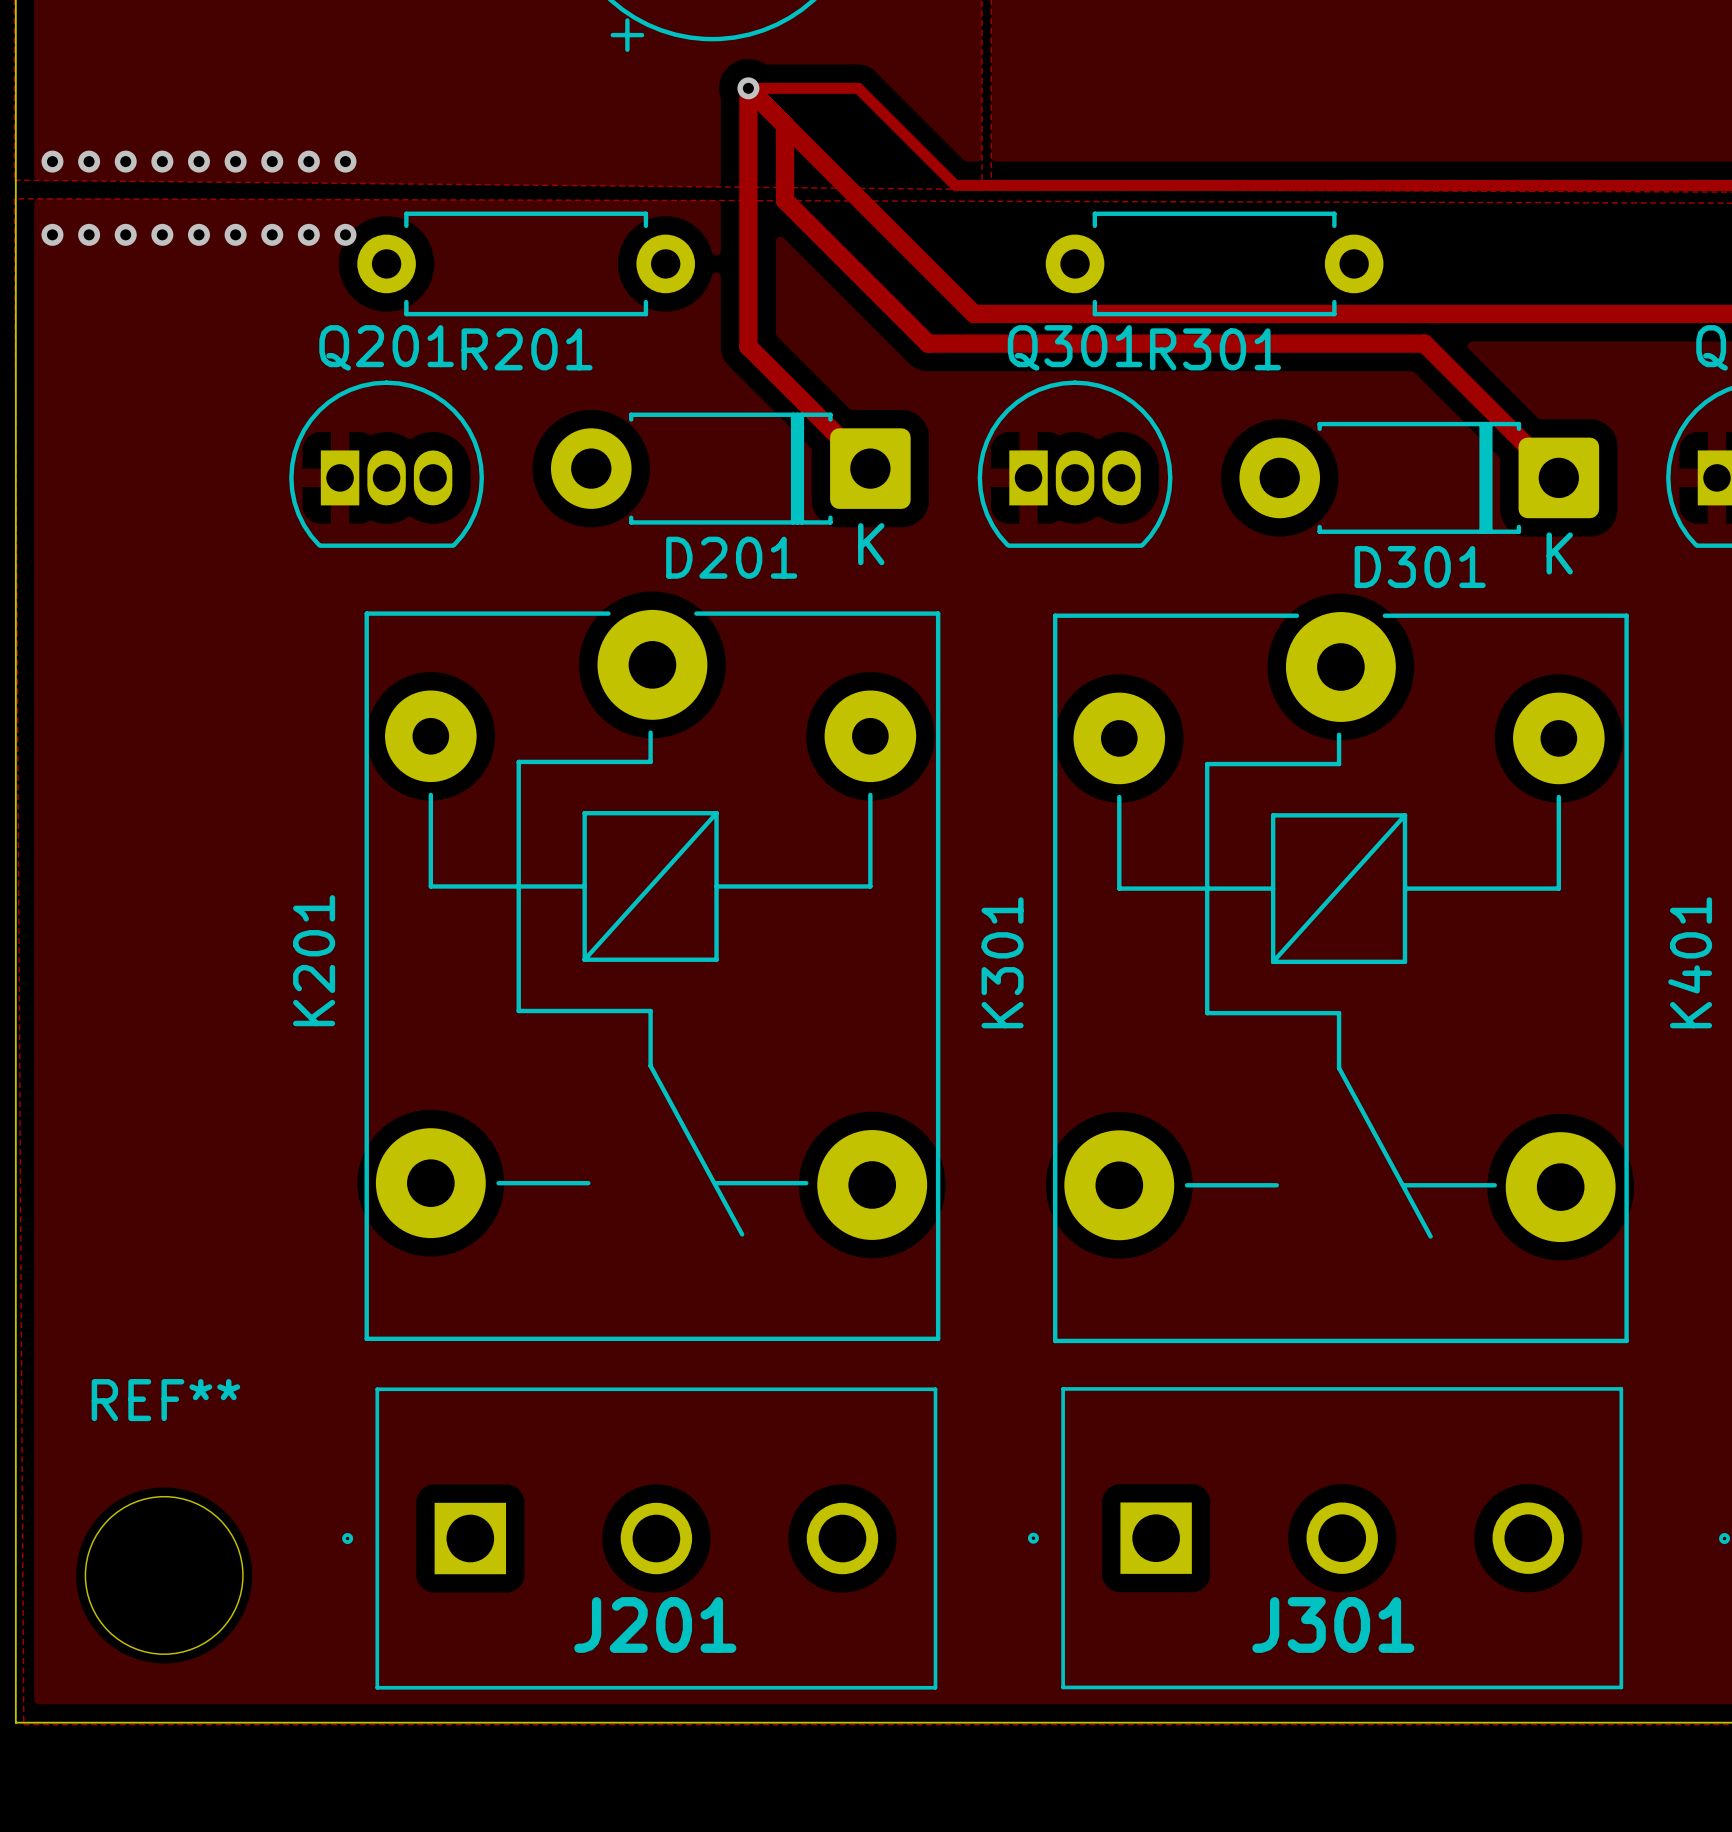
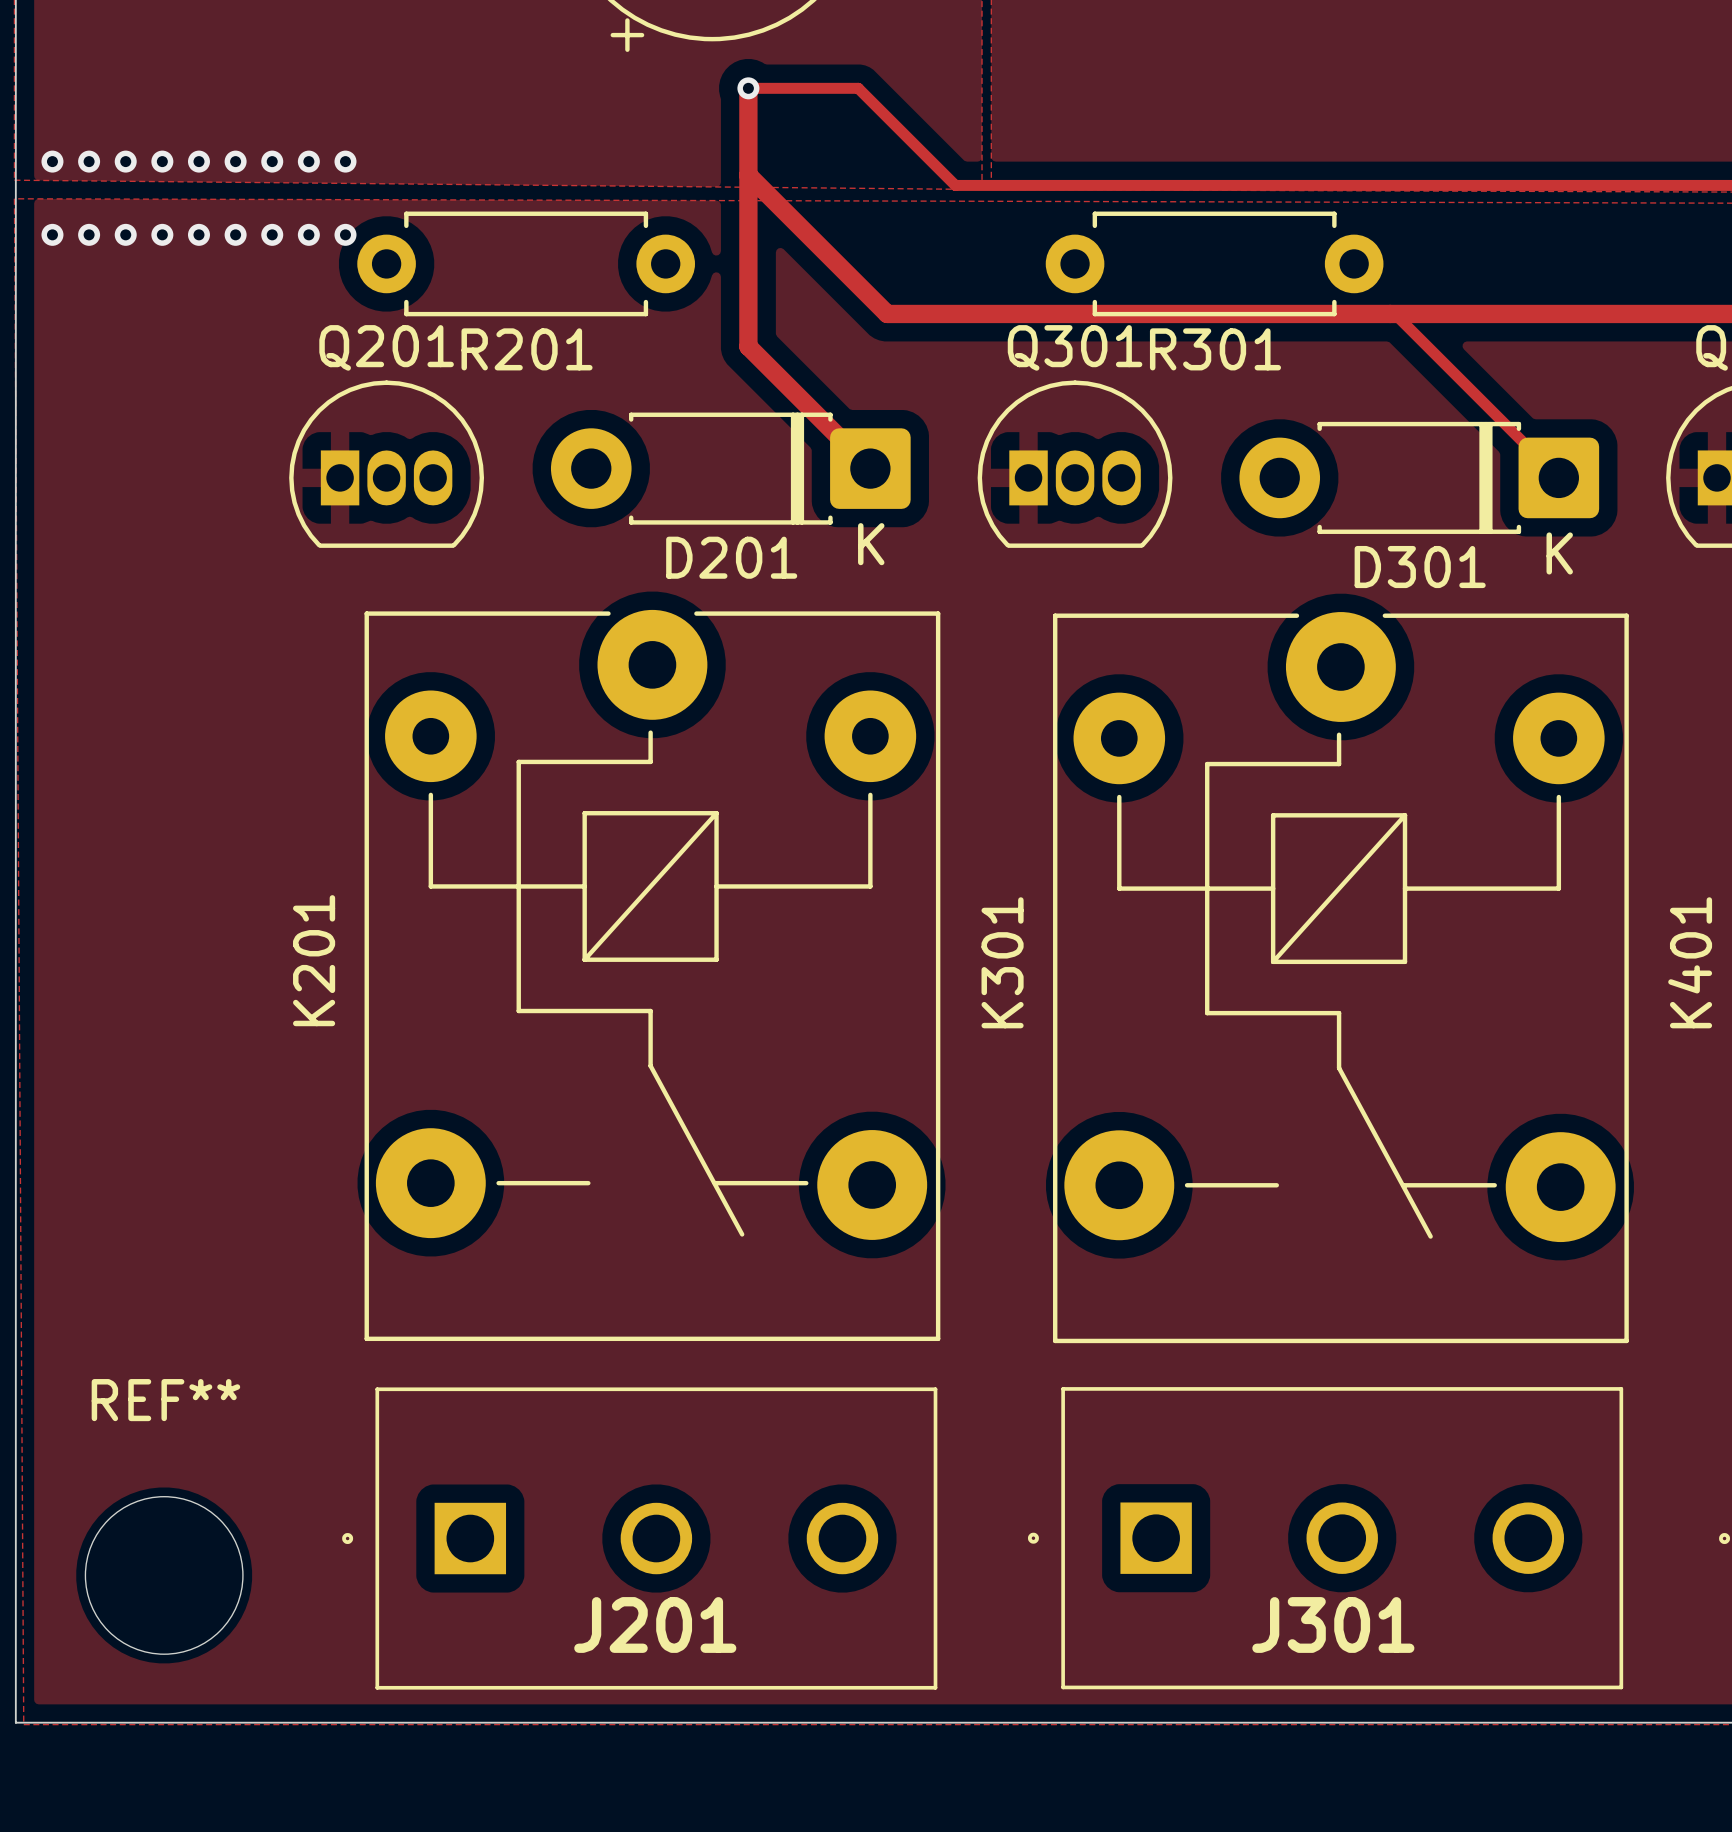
track: (748, 88) (974, 313) -> (748, 175) (887, 313) (974, 313)
track: (785, 124) (785, 200) (928, 343) (1424, 343) -> (1390, 313) (1394, 313) (1424, 343)
track width: thick (1424, 343) (1558, 477) -> thin (1424, 343) (1558, 477)

